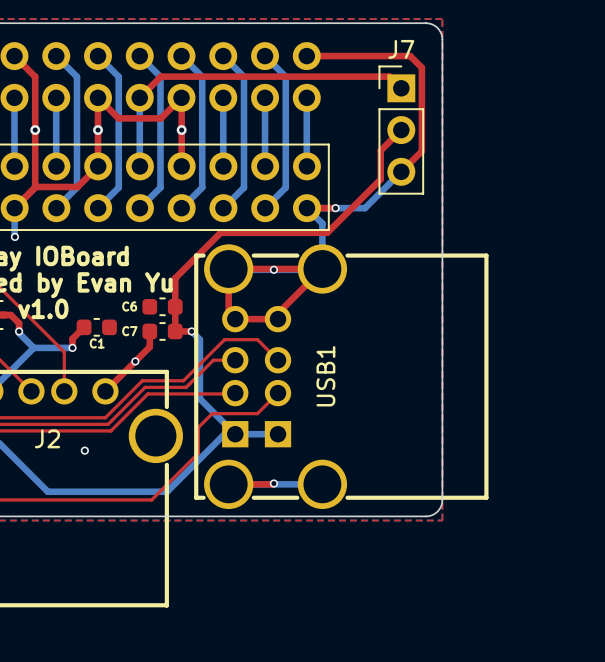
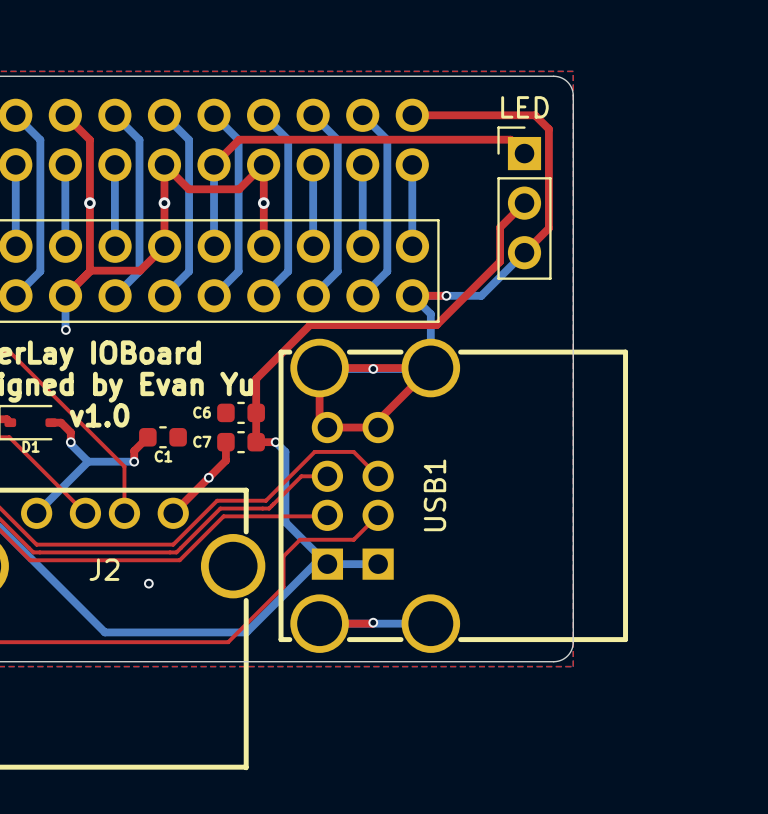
J7 name: J7 (401, 49) -> LED (524, 107)

